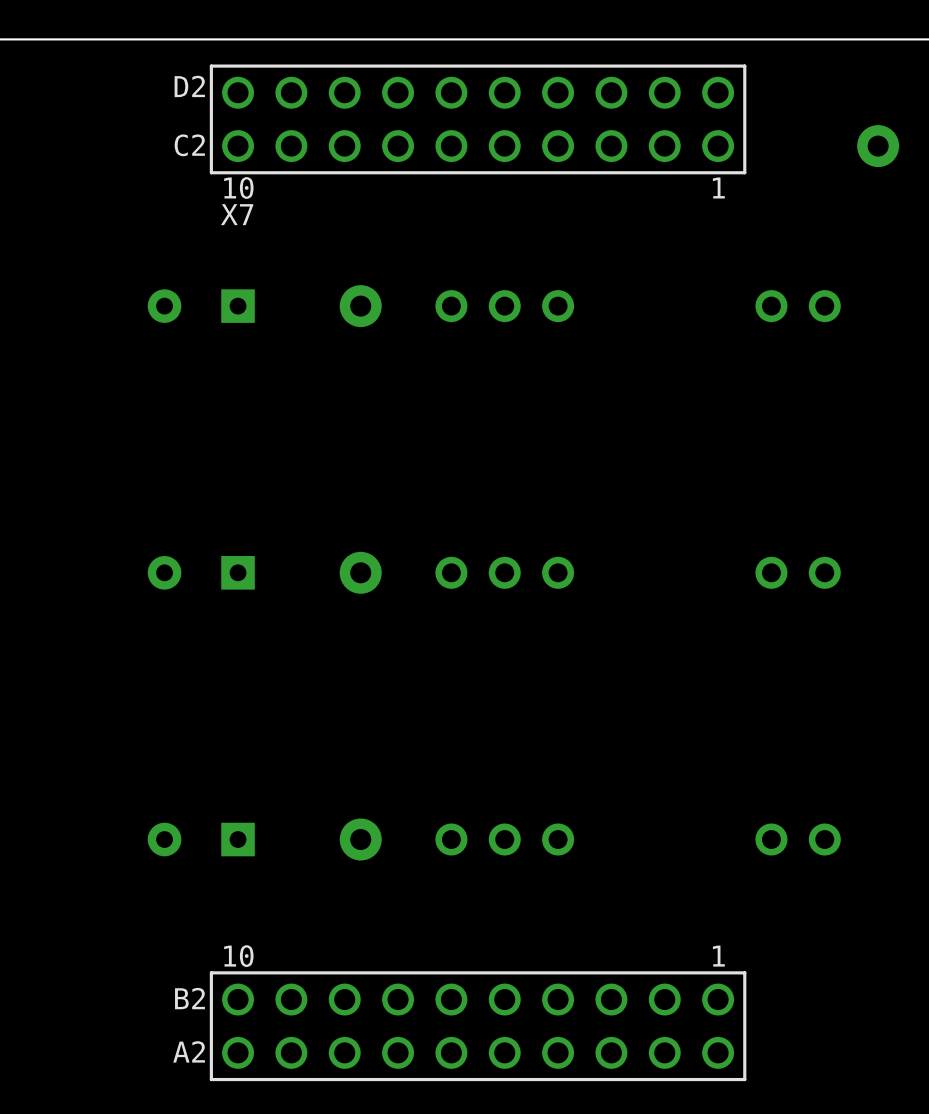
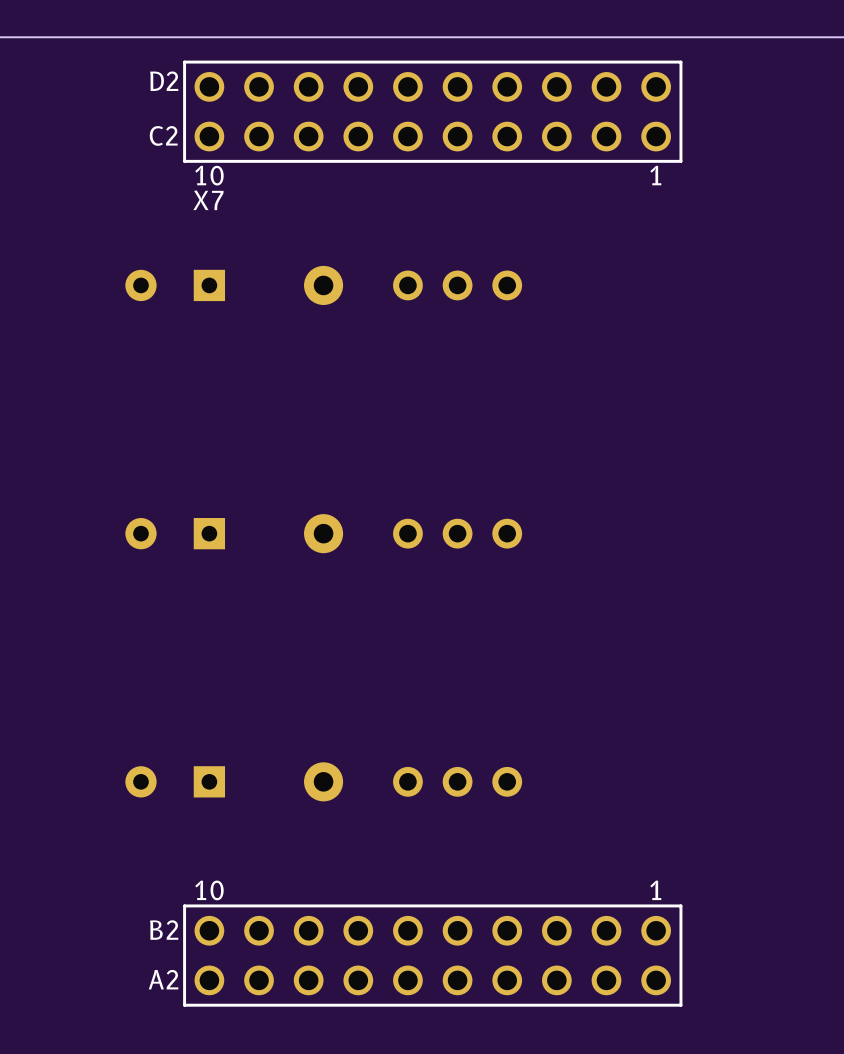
part: (878, 146) -> none
part: (798, 306) -> none
part: (798, 572) -> none
part: (798, 839) -> none

